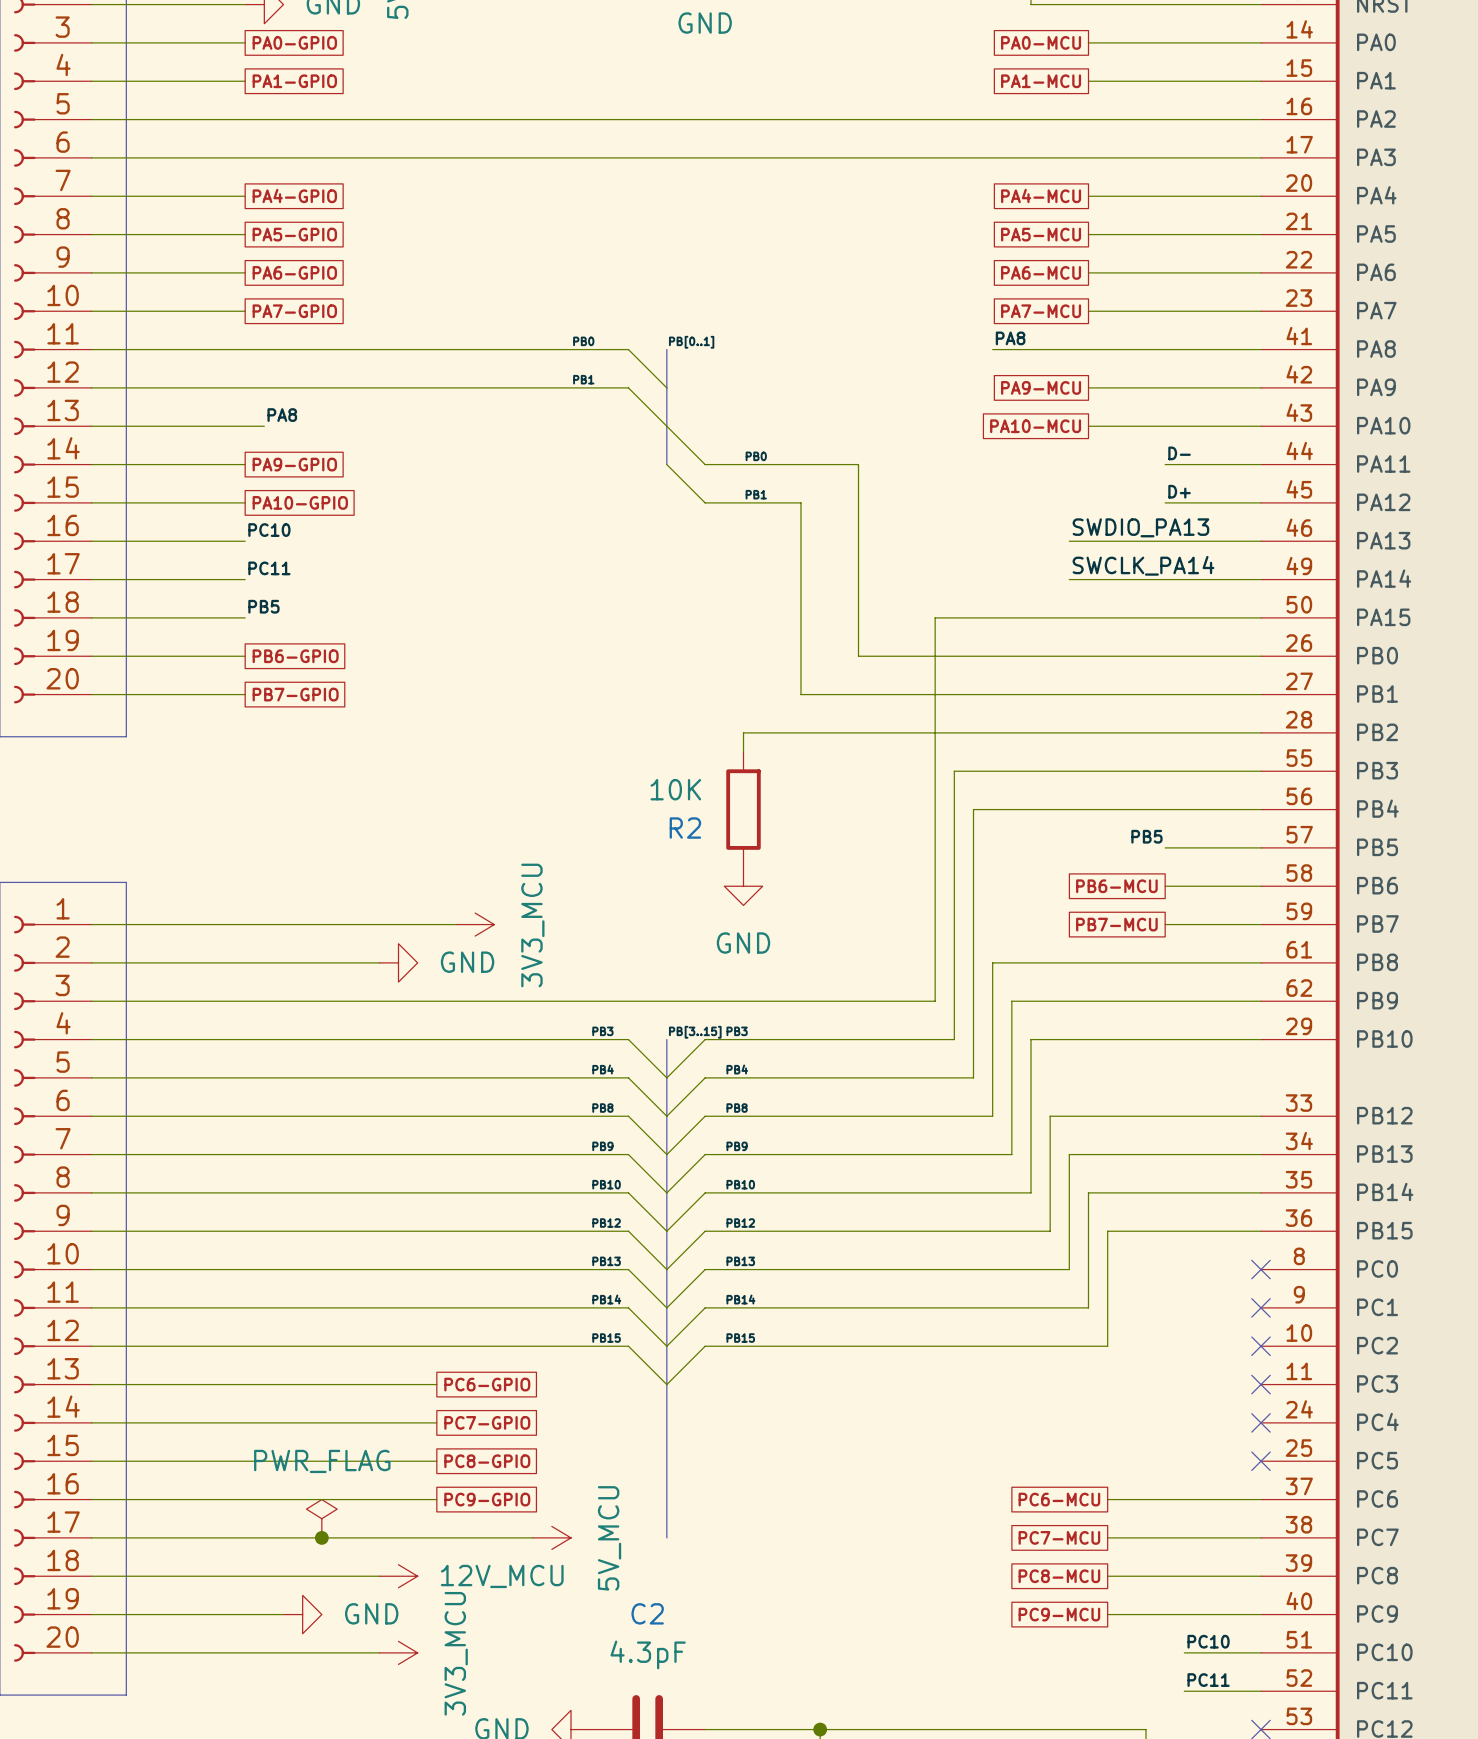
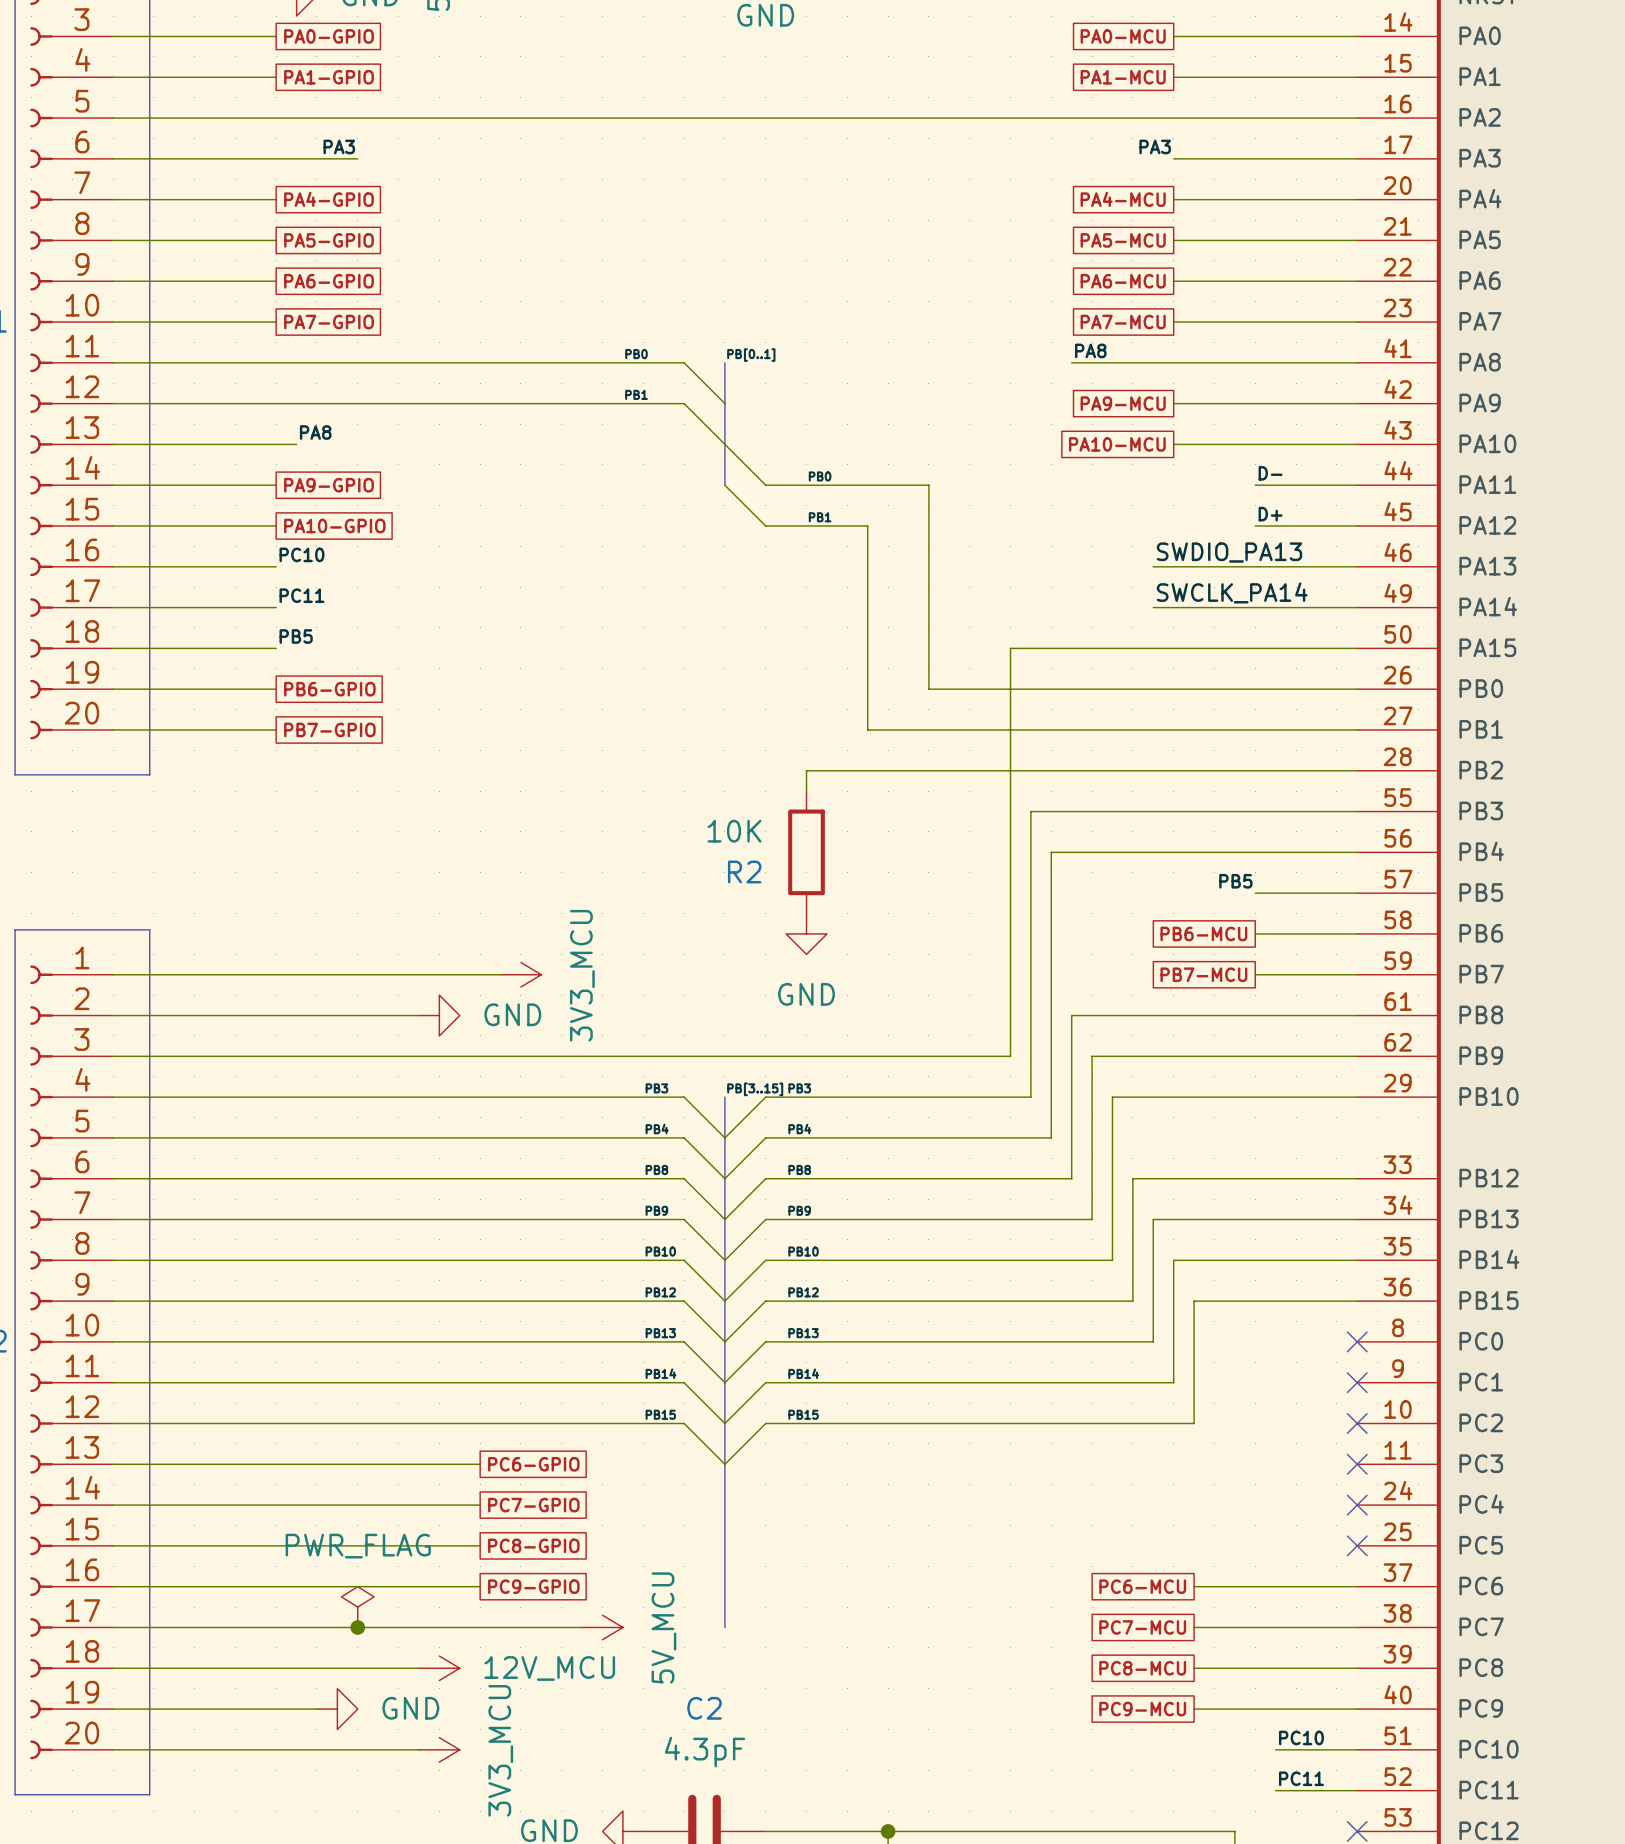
label: none -> PA3 (339, 146)
label: none -> PA3 (1155, 146)
wire: (321, 157) (1088, 157) -> none

